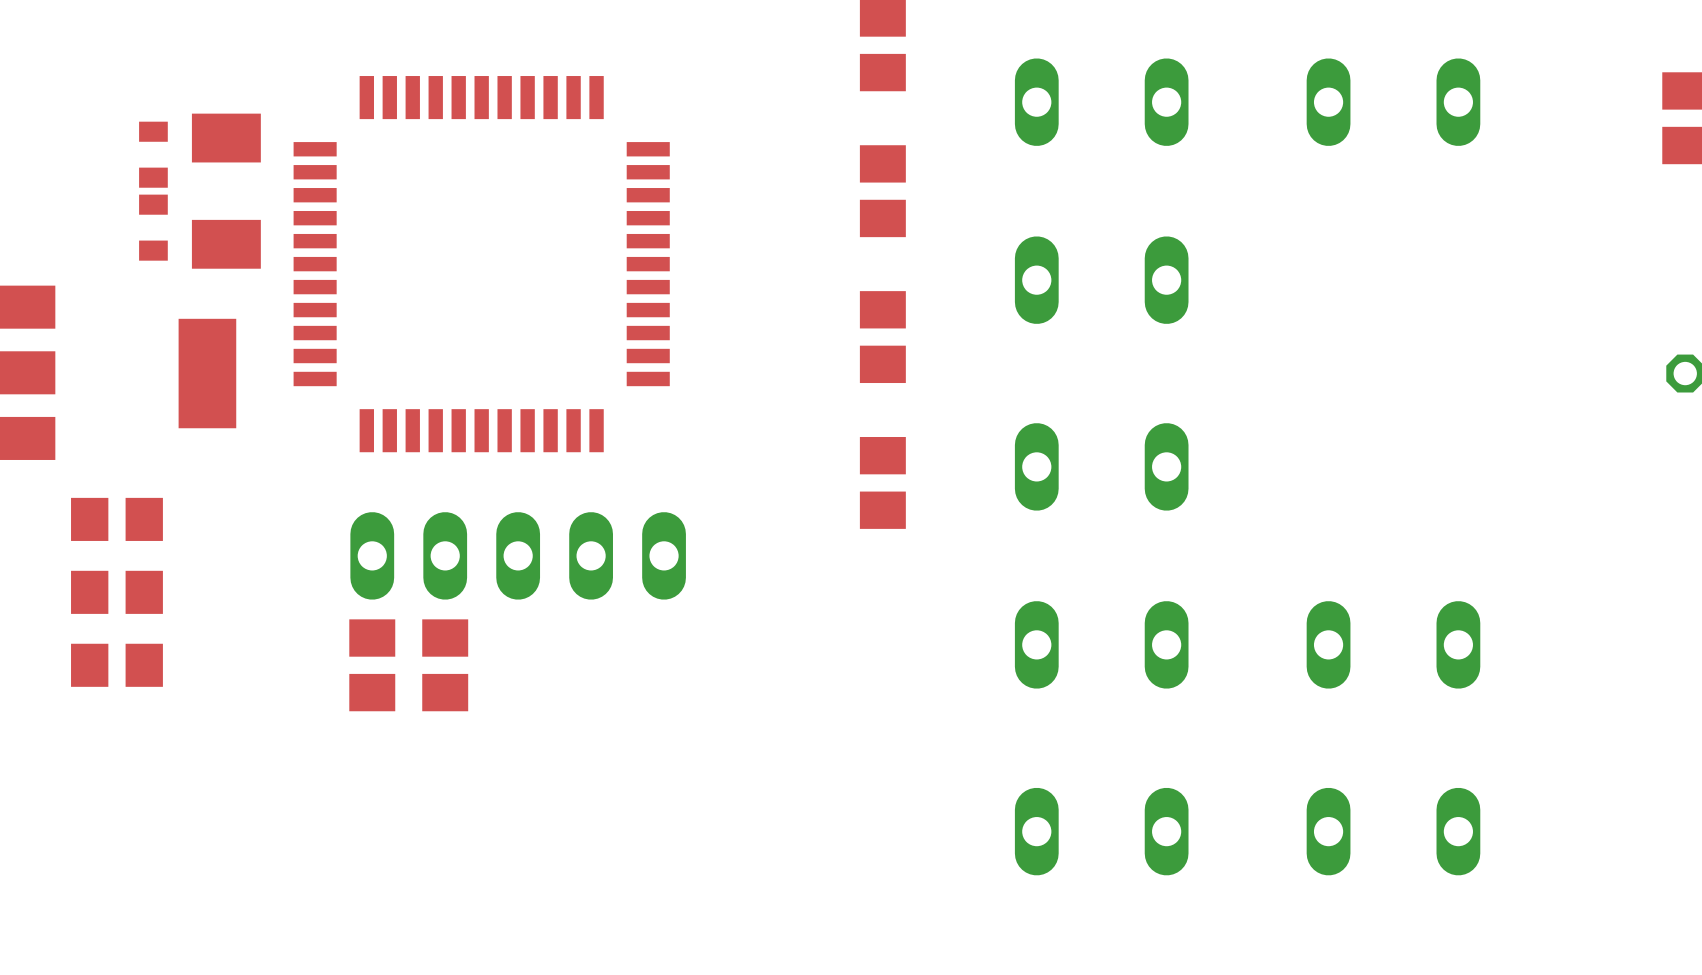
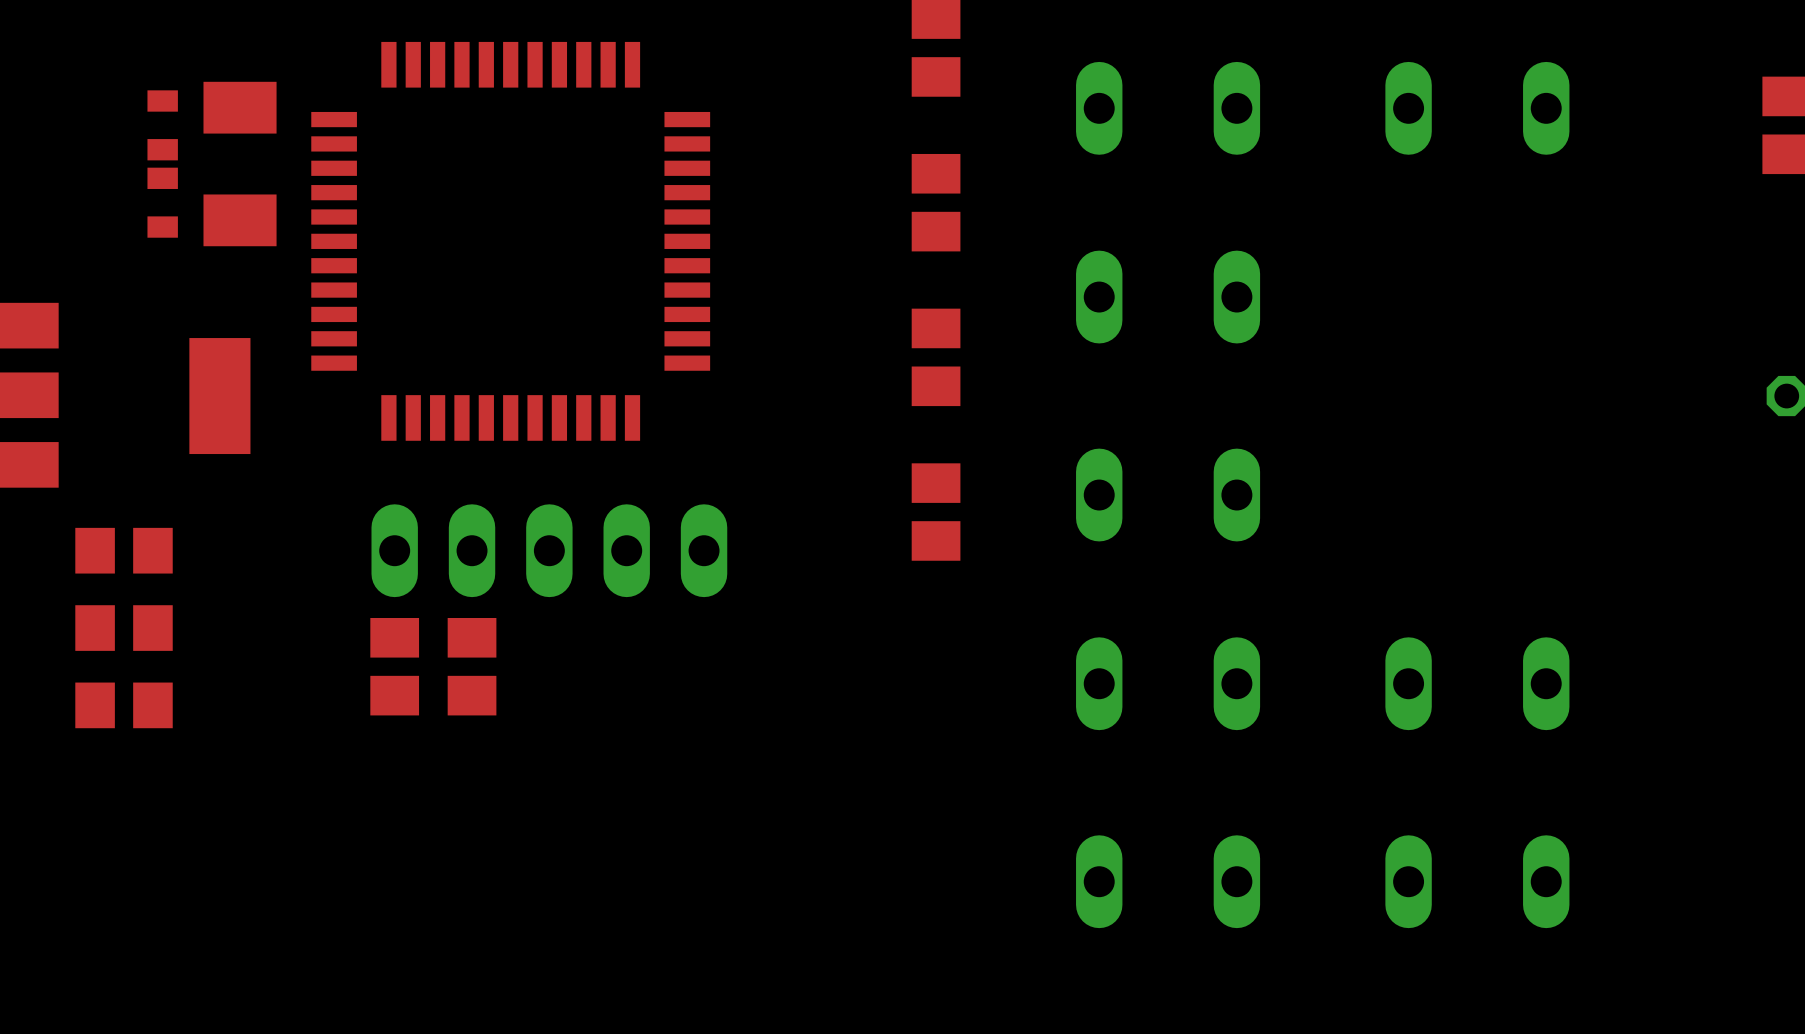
part: none -> (162, 125)
part: (153, 154) -> none
part: none -> (162, 202)
part position: (226, 191) -> (240, 164)
part: (153, 227) -> none
part position: (481, 264) -> (510, 241)
part position: (518, 555) -> (549, 550)
part position: (372, 665) -> (394, 666)
part position: (445, 665) -> (472, 666)

